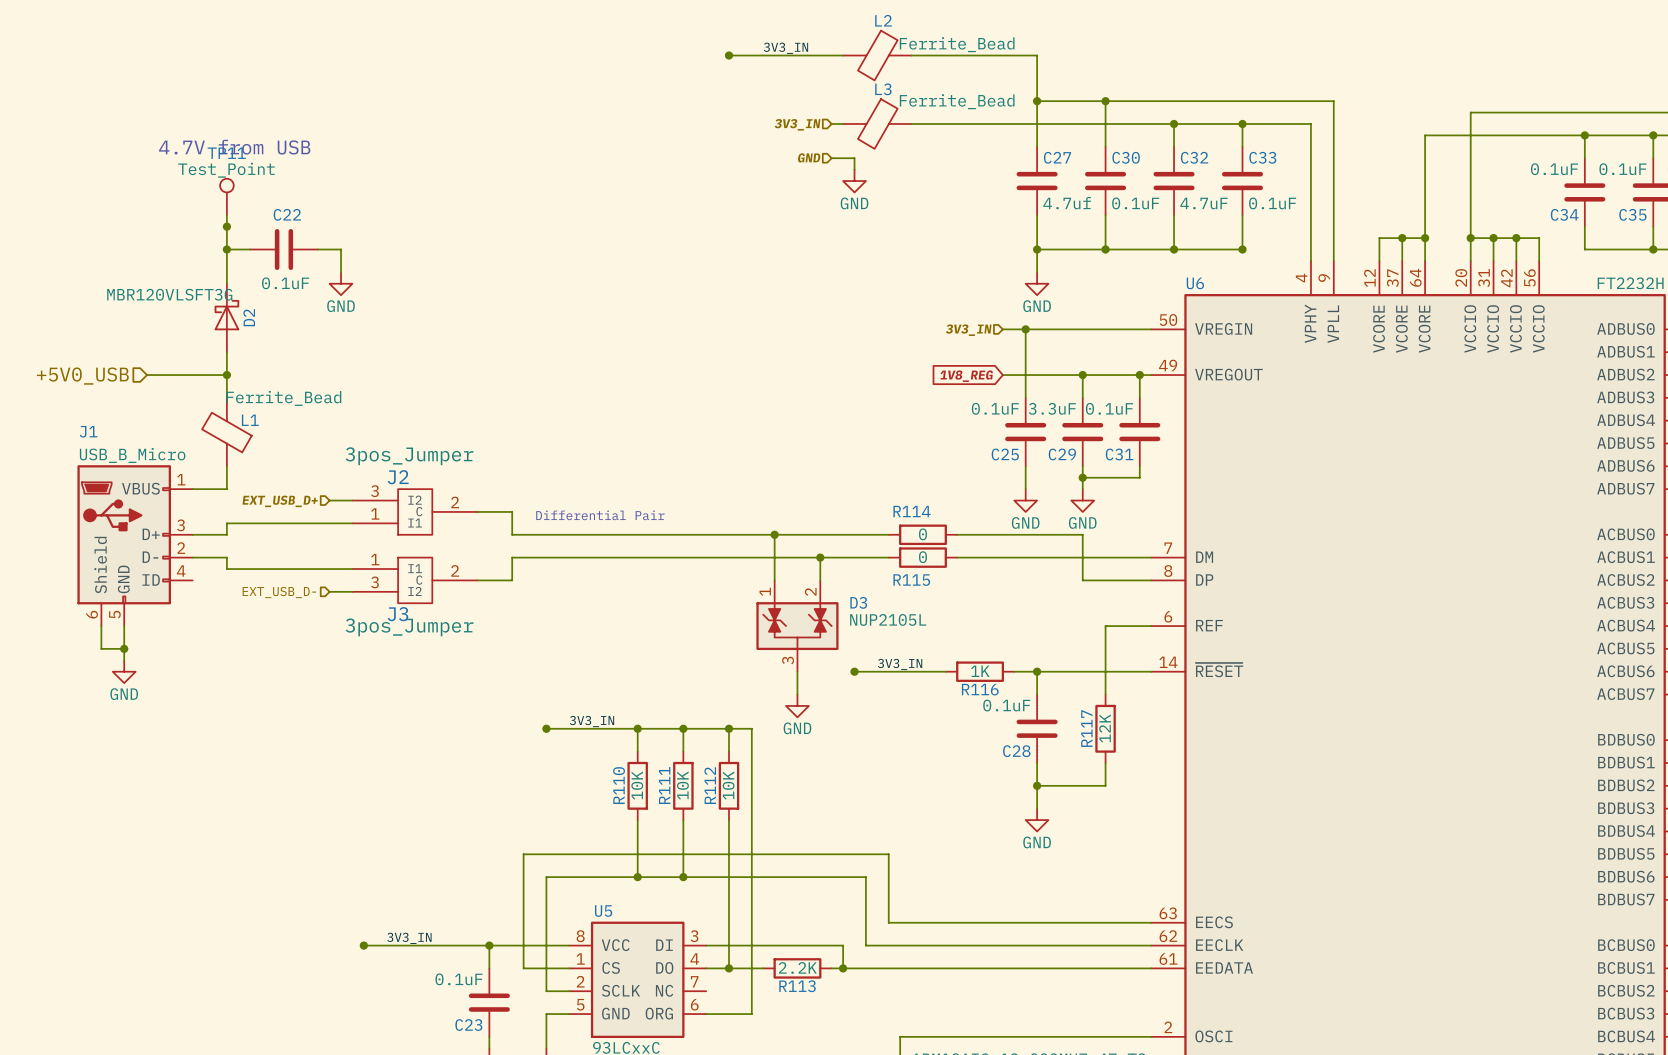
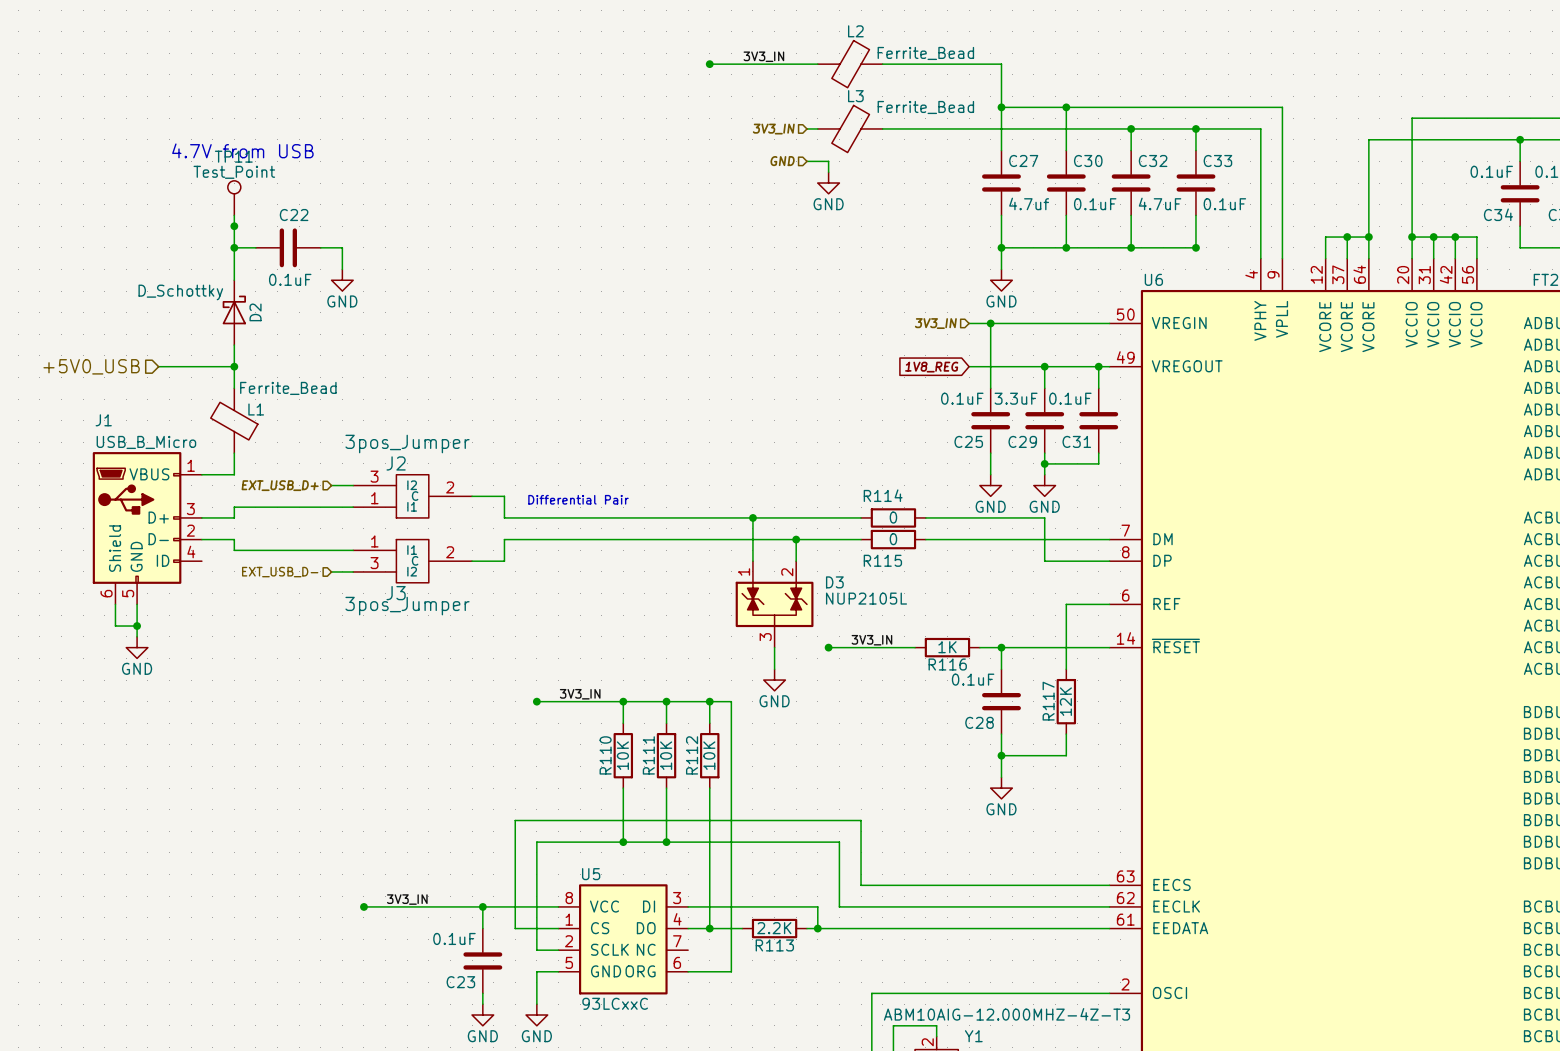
D2 value: MBR120VLSFT3G (169, 294) -> D_Schottky (180, 292)

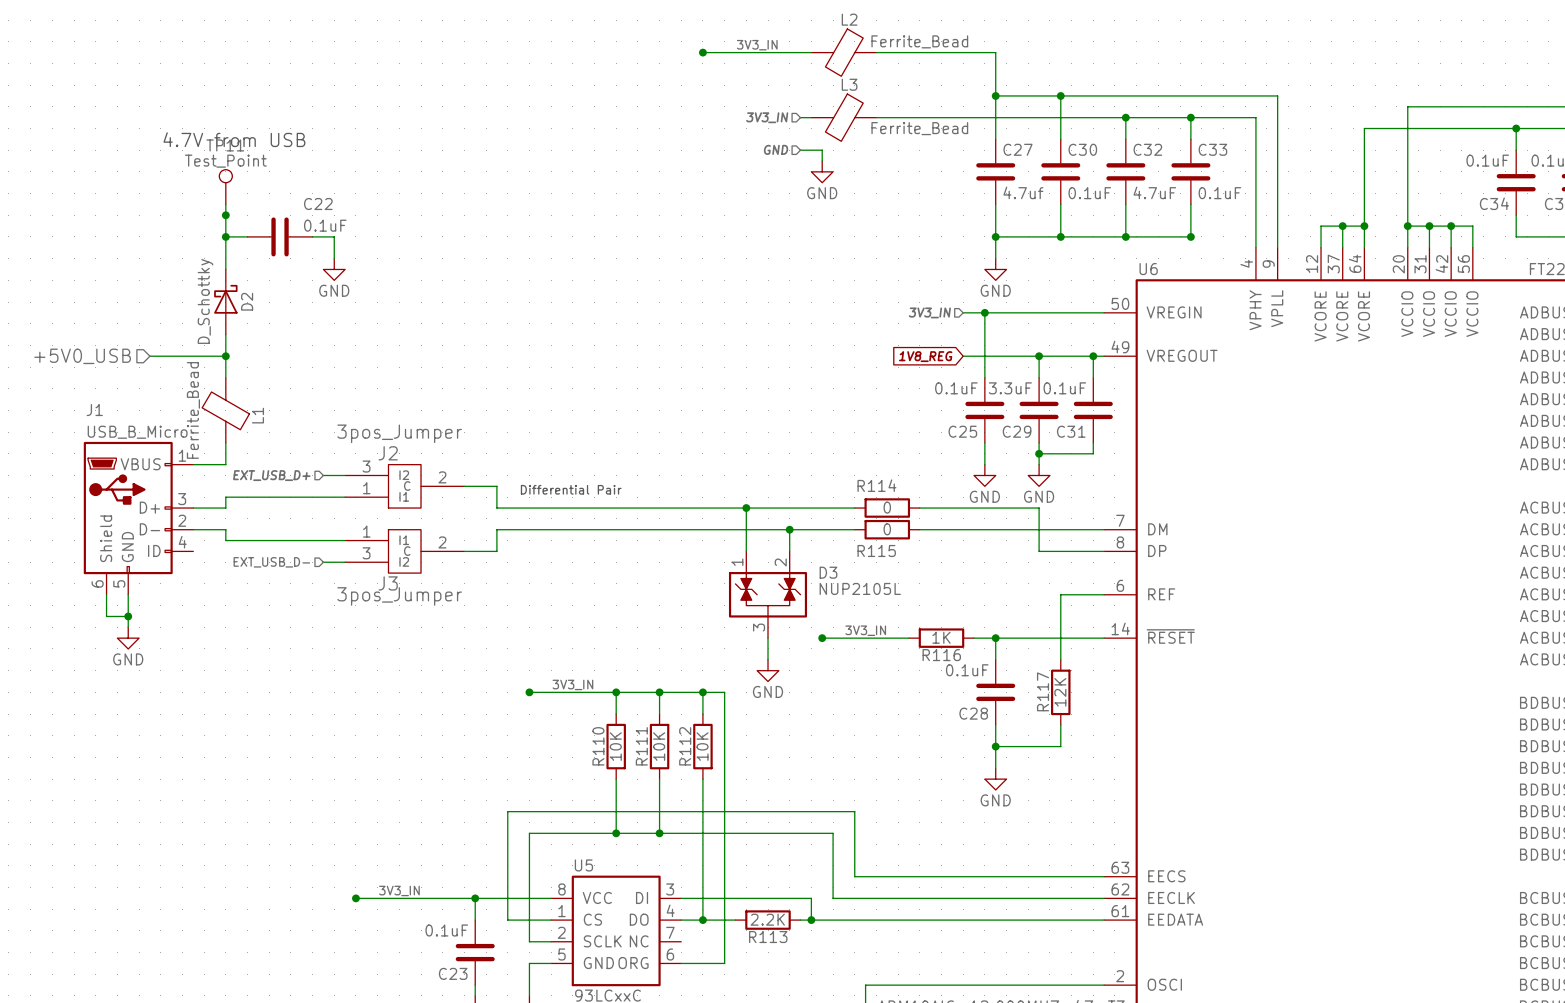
L3 value position: Ferrite_Bead (925, 107) -> Ferrite_Bead (919, 128)
C22 name position: C22 (294, 215) -> C22 (318, 204)
C22 value position: 0.1uF (290, 279) -> 0.1uF (325, 225)
D2 value rotation: 0° (180, 292) -> 90° counterclockwise (205, 301)
L1 value rotation: 0° (288, 388) -> 90° counterclockwise (193, 410)
L1 name rotation: 0° (256, 409) -> 90° counterclockwise (257, 415)

